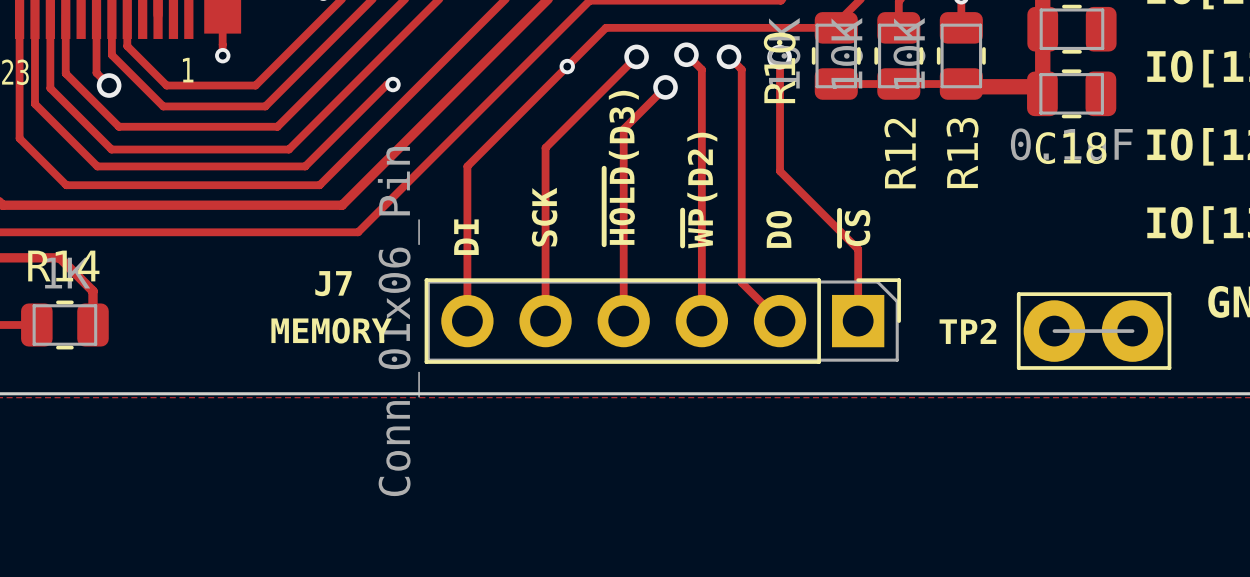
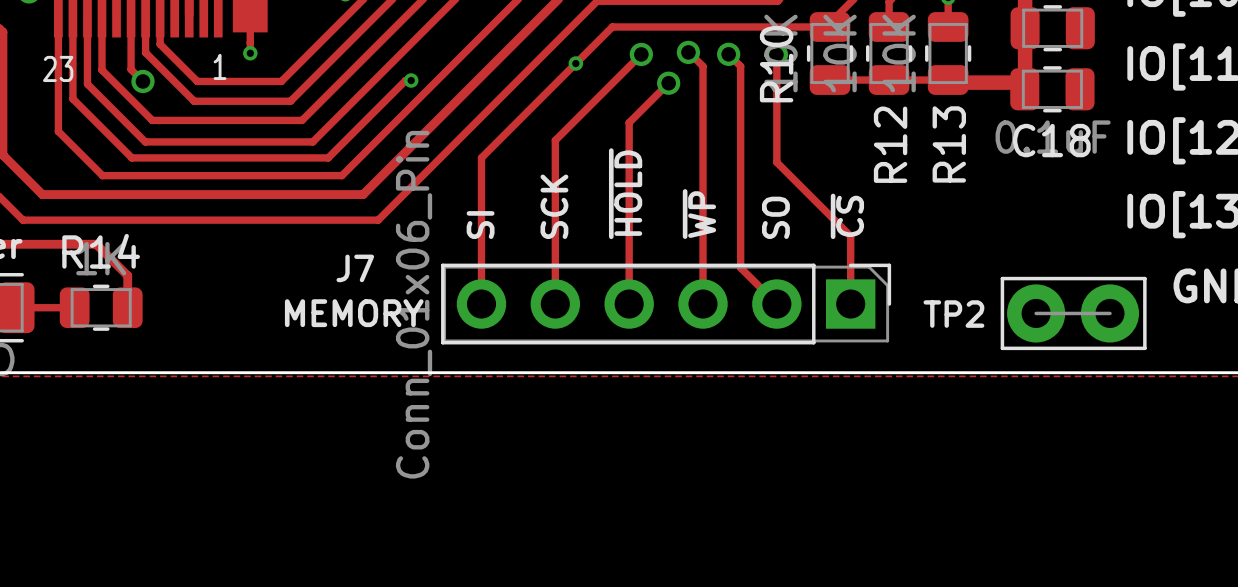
text: ~{HOLD}(D3) (621, 167) -> ~{HOLD} (625, 193)
text: ~{WP}(D2) (699, 190) -> ~{WP} (699, 214)
text: DO (779, 229) -> SO (775, 217)
text: DI (466, 237) -> SI (480, 225)

